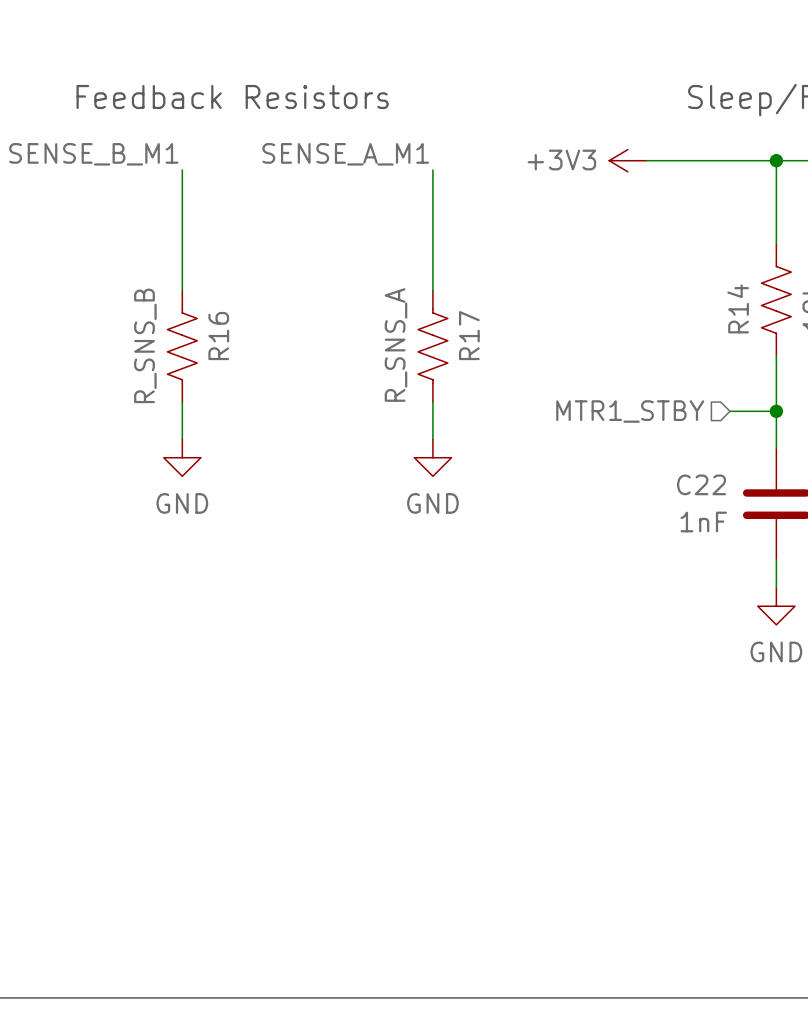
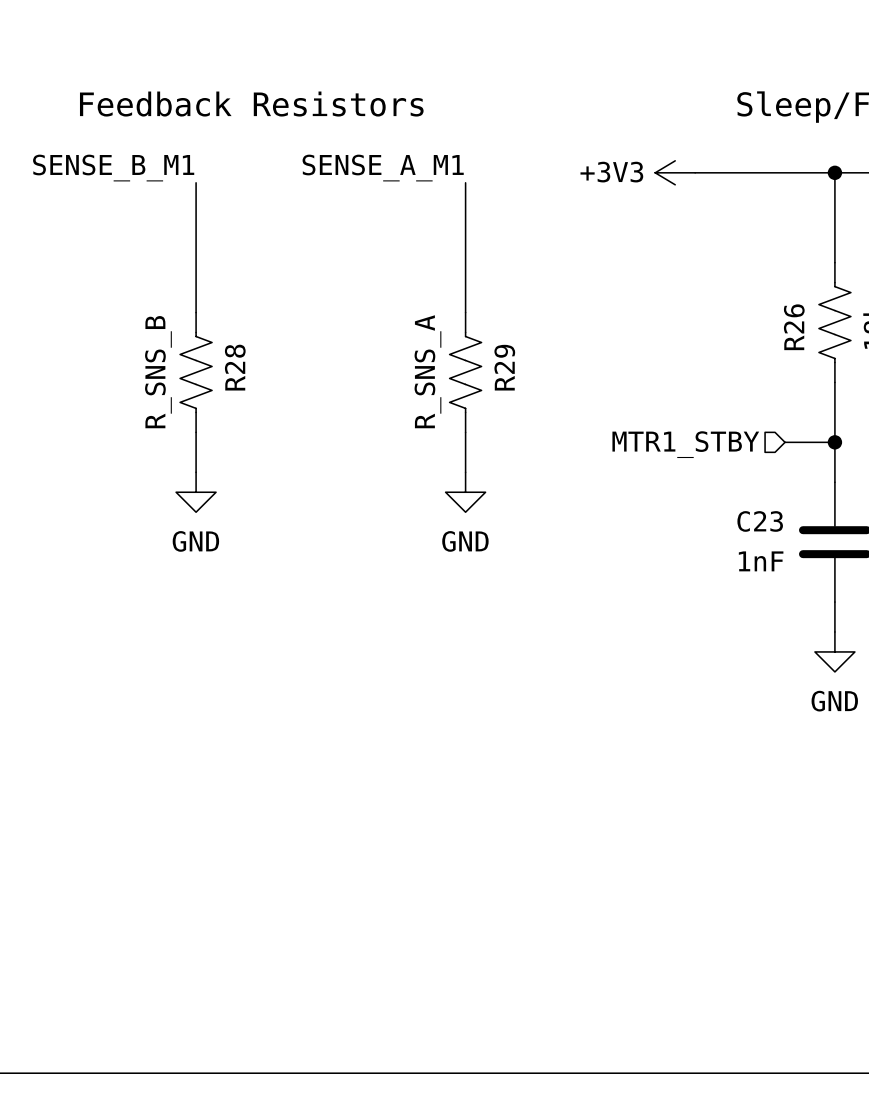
R14 name: R14 (738, 308) -> R26 (794, 327)
R17 name: R17 (469, 335) -> R29 (504, 367)
R16 name: R16 (218, 336) -> R28 (235, 367)
C22 name: C22 (701, 484) -> C23 (760, 521)

